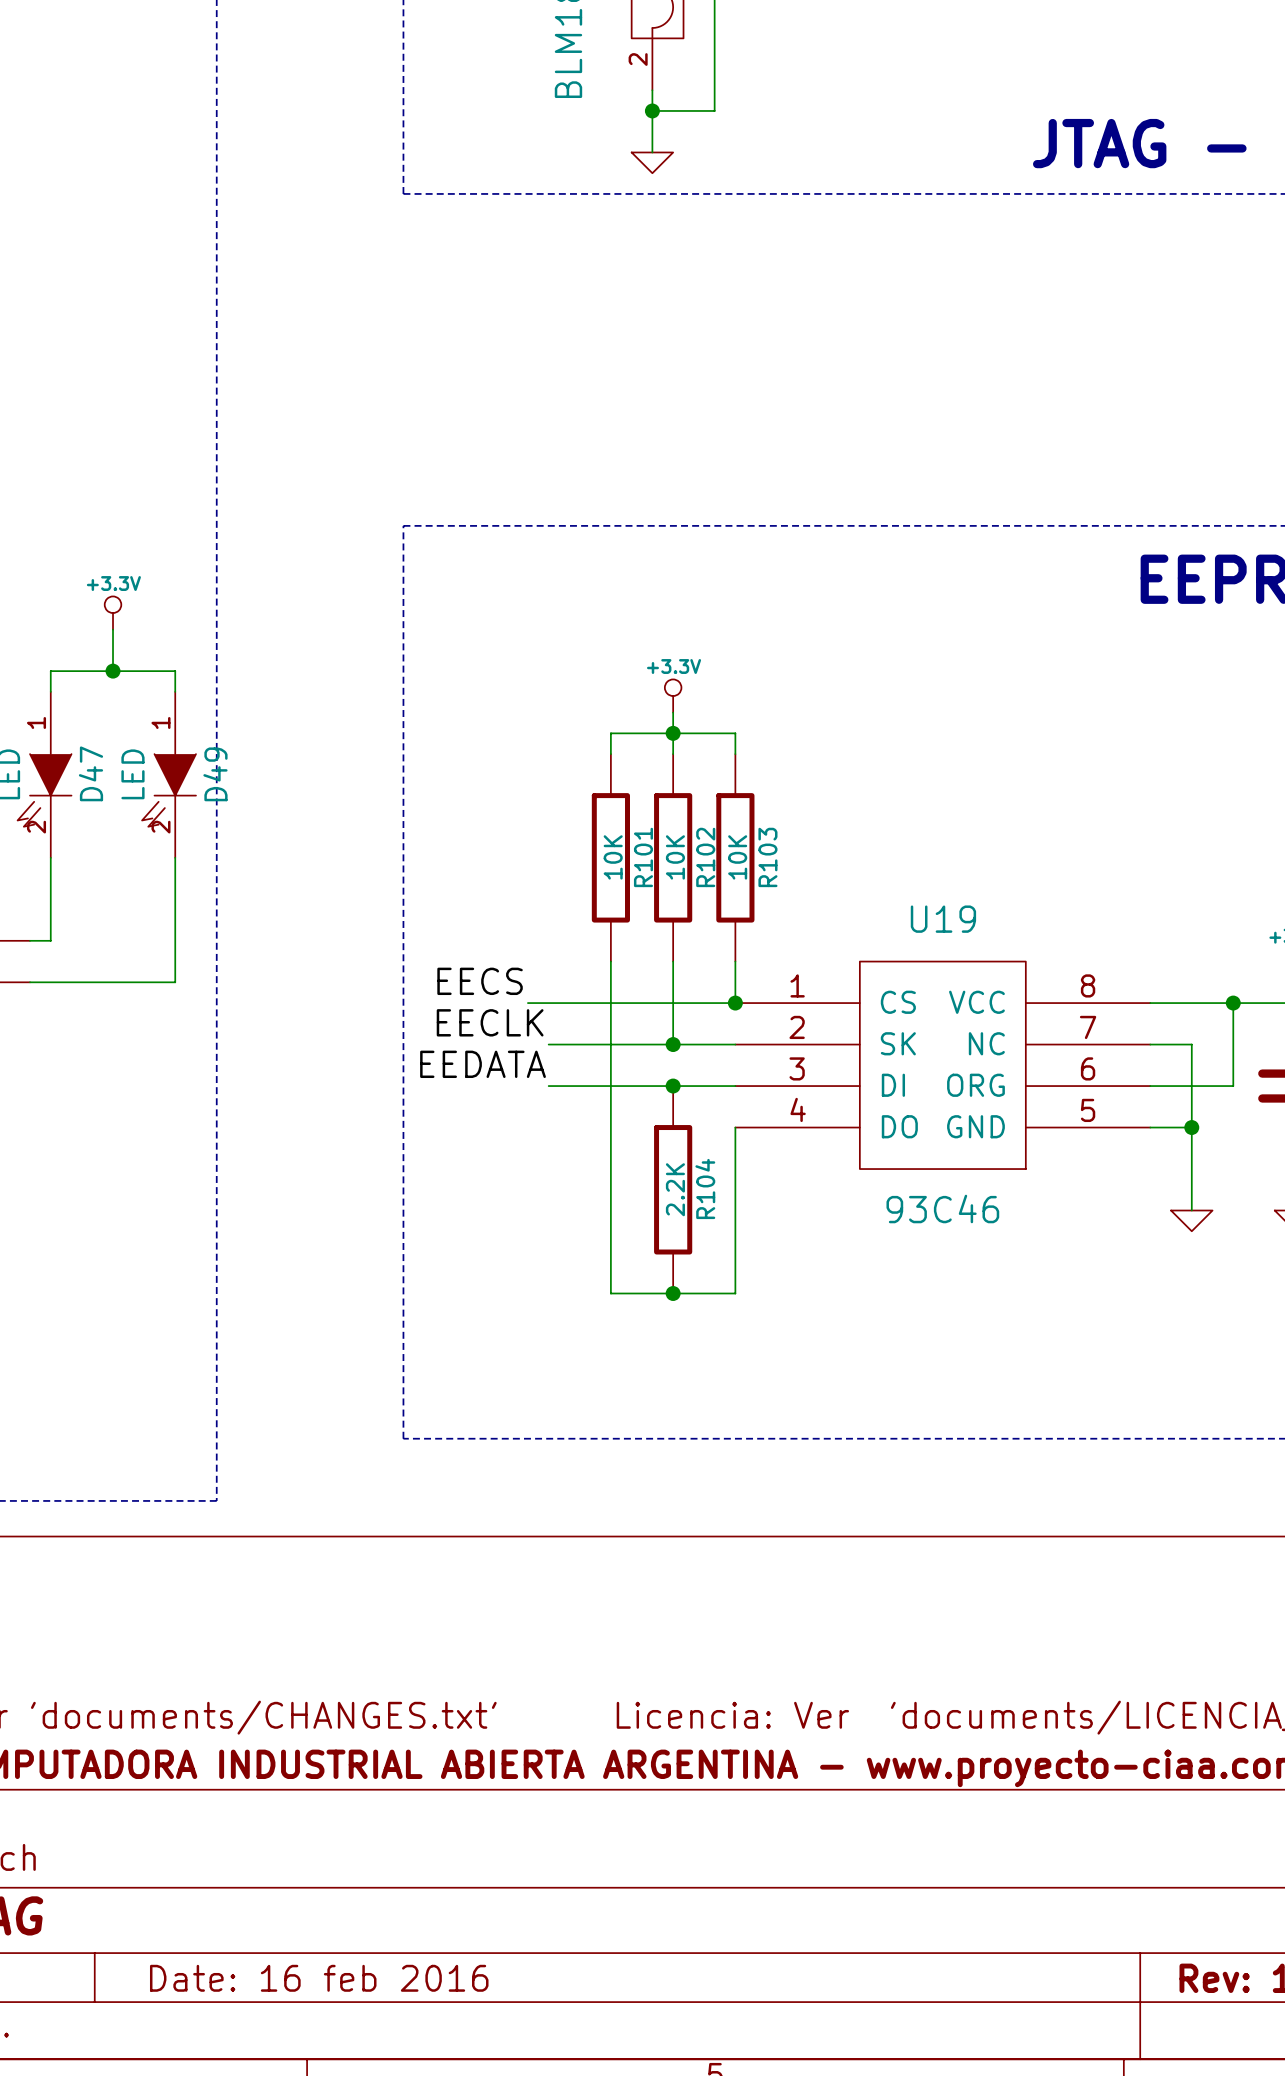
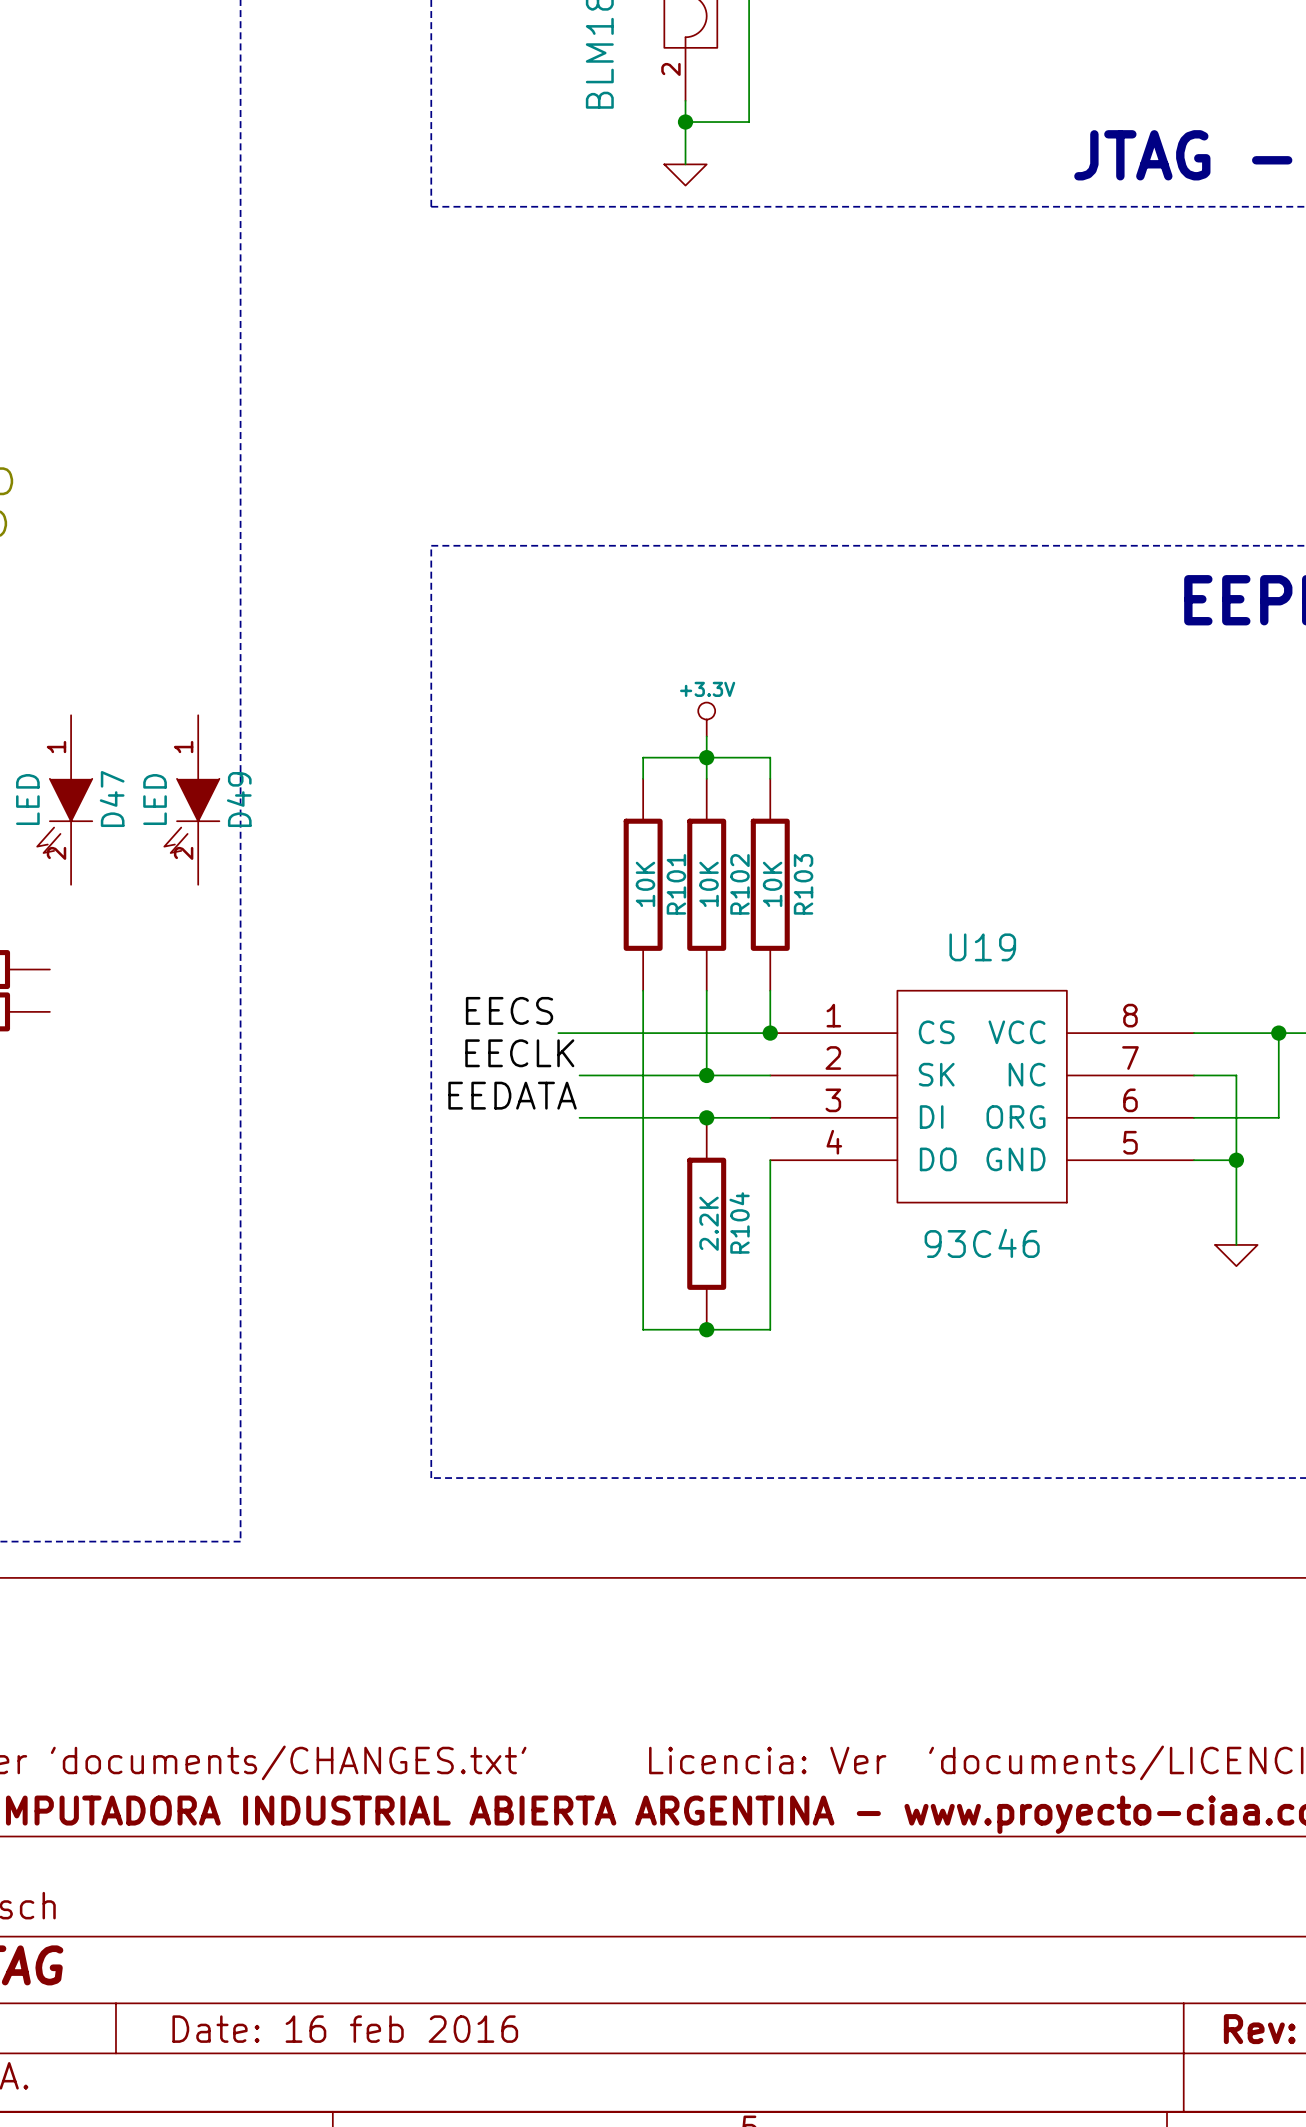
power symbol: +3.3V (113, 613) -> none
wire: (113, 629) (113, 671) -> none
junction: (113, 671) -> none
wire: (50, 691) (50, 671) (175, 671) (175, 691) -> none
wire: (50, 857) (50, 940) (30, 940) -> none
wire: (175, 857) (175, 982) (30, 982) -> none

